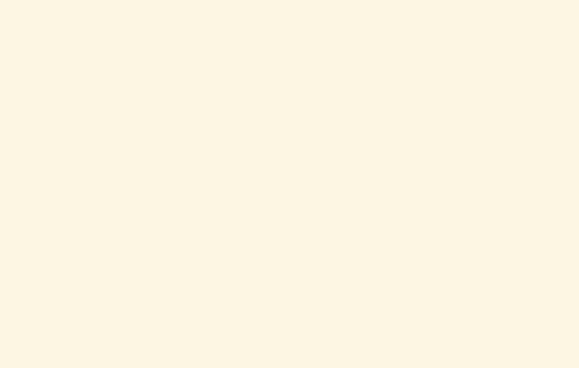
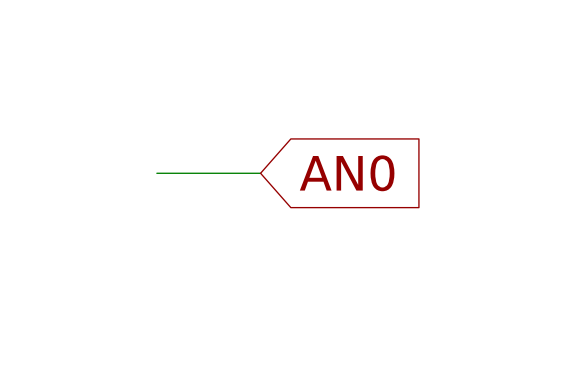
wire: none -> (156, 173) (260, 173)
global label: none -> AN0 (347, 173)

